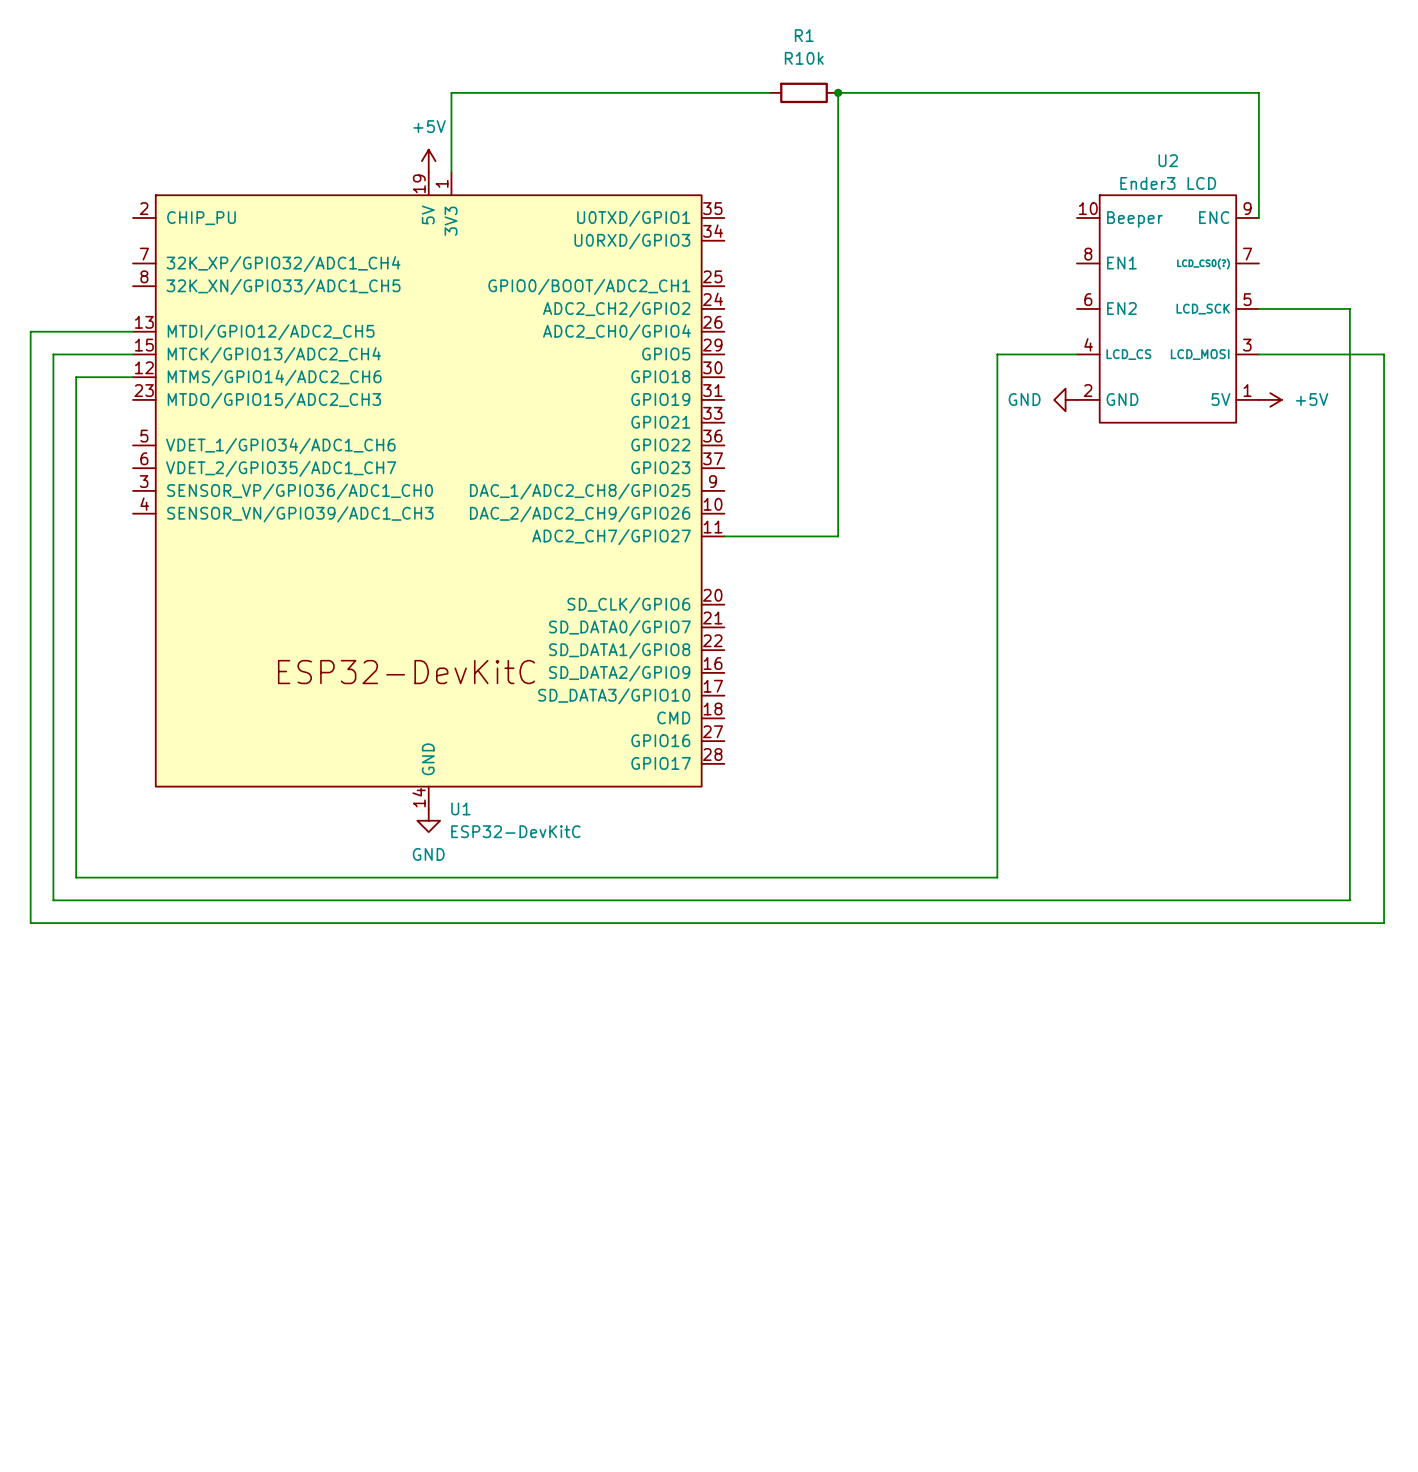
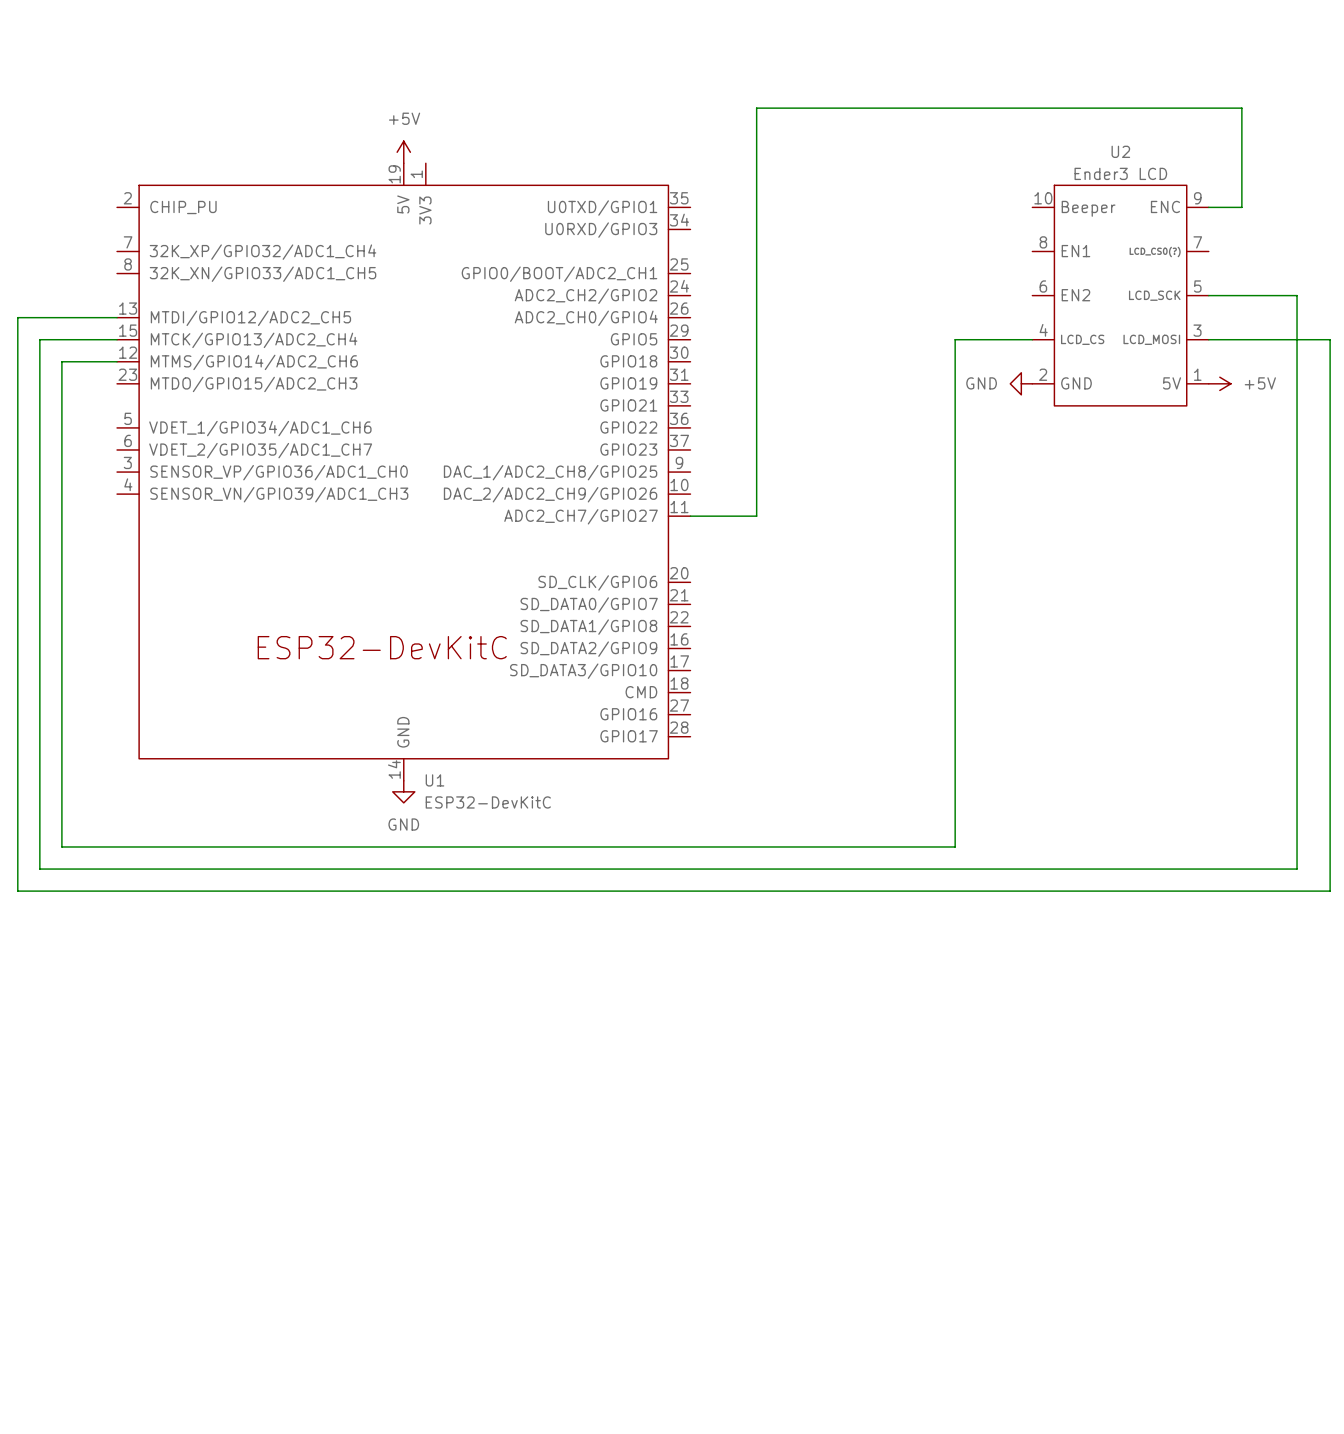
wire: (769, 92) (451, 92) (451, 172) -> none
R1: R10k (804, 92) -> none
junction: (838, 92) -> none
wire: (1258, 217) (1258, 92) (838, 92) (838, 536) (792, 536) -> (1208, 207) (1241, 207) (1241, 108) (756, 108) (756, 516)

